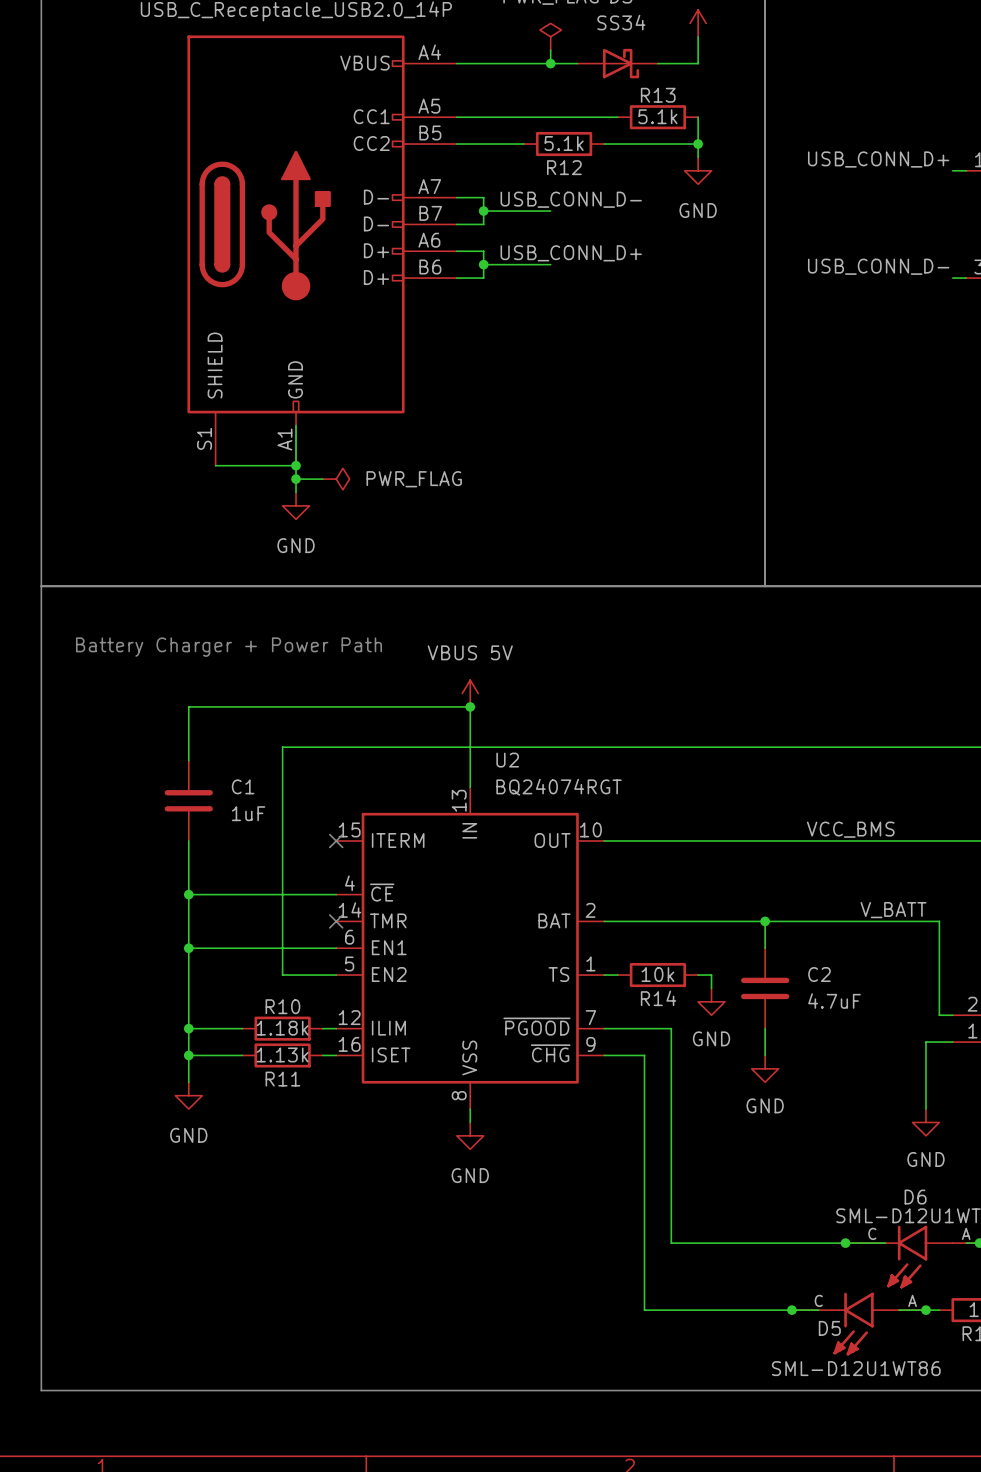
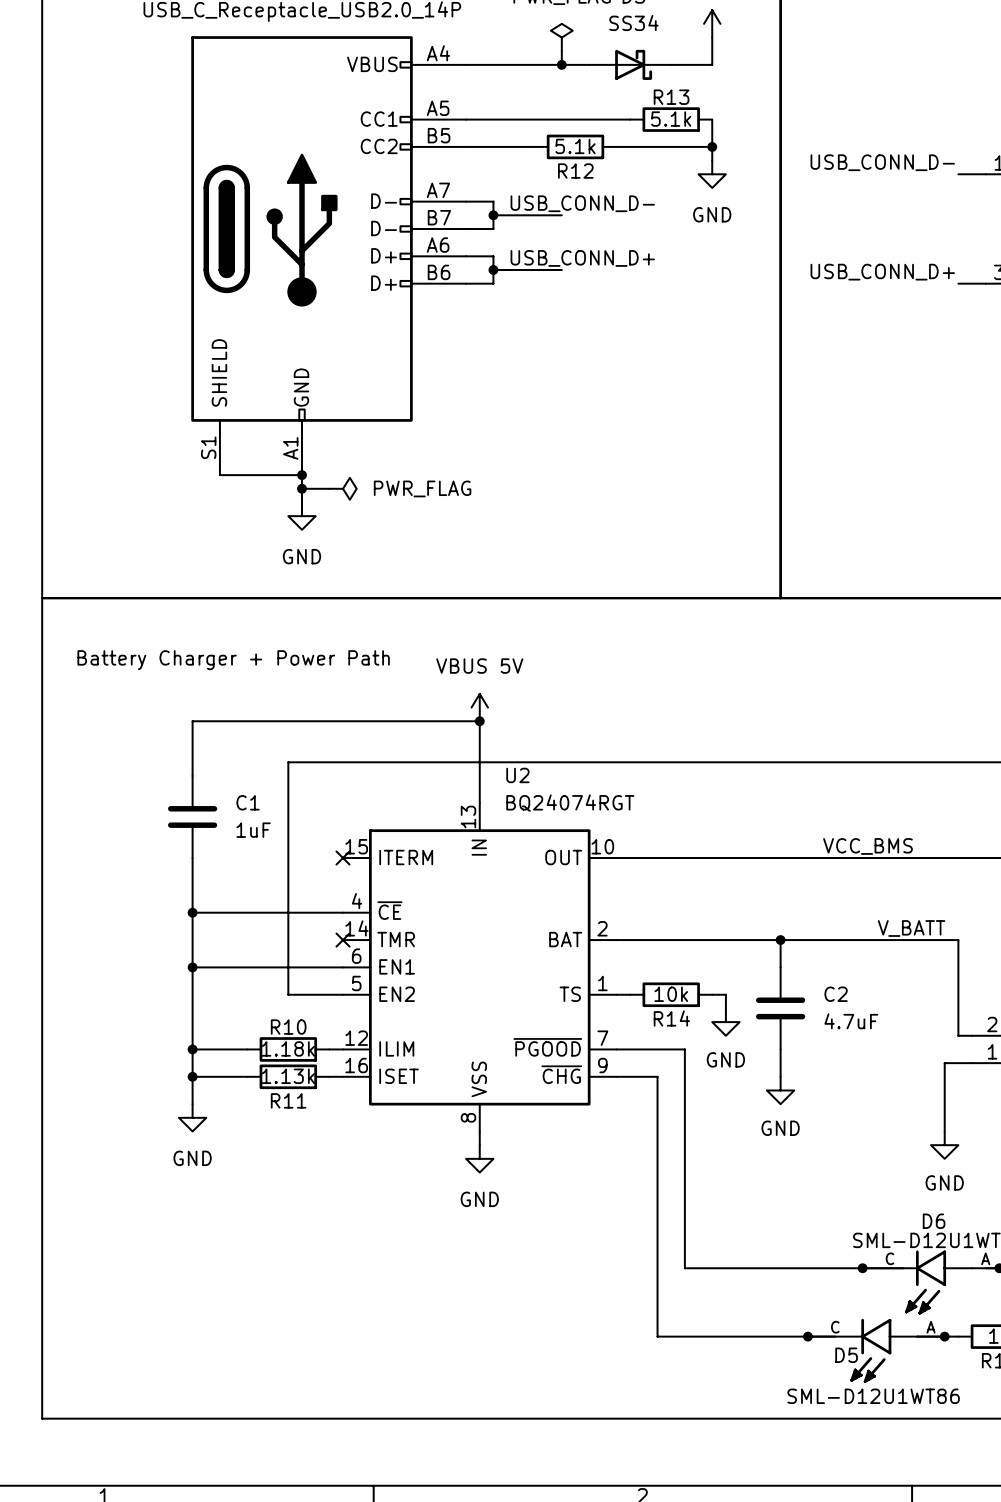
label position: USB_CONN_D+ (878, 159) -> USB_CONN_D+ (882, 272)
wire: none -> (958, 174) (972, 174)
label position: USB_CONN_D- (878, 266) -> USB_CONN_D- (882, 162)
wire: none -> (958, 283) (972, 283)

